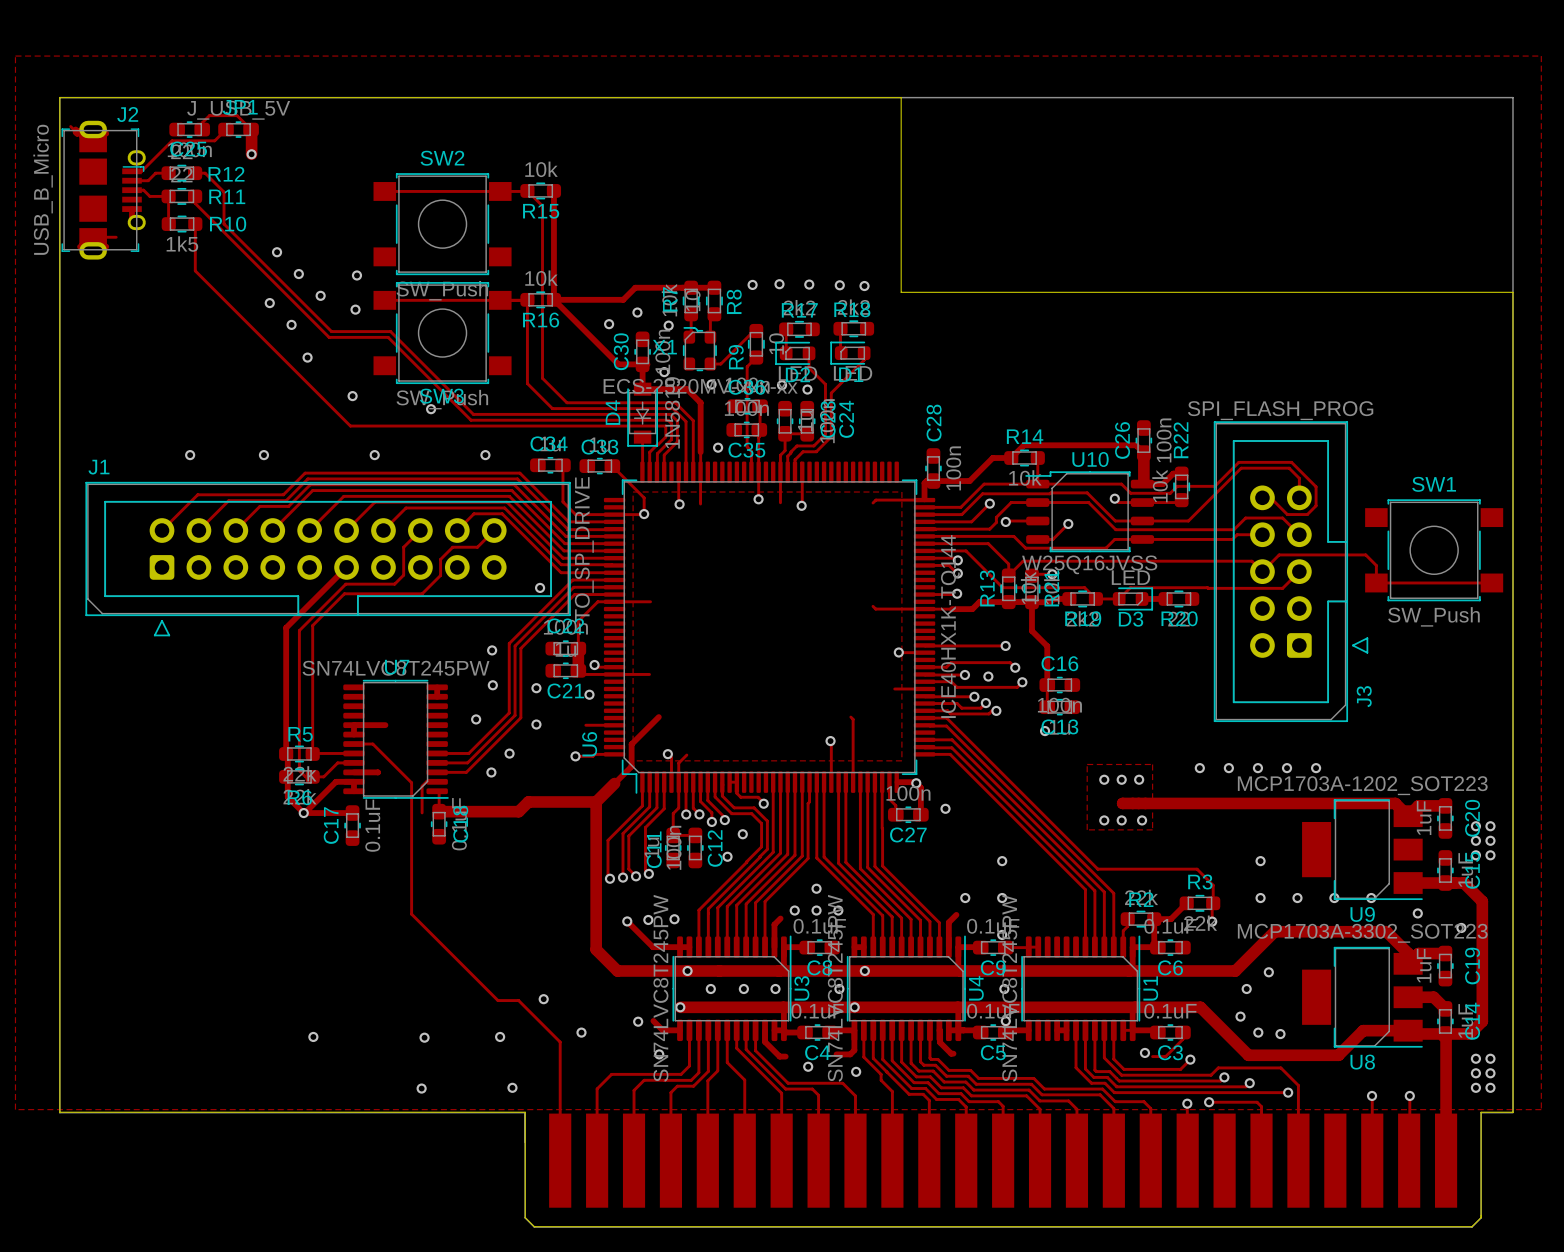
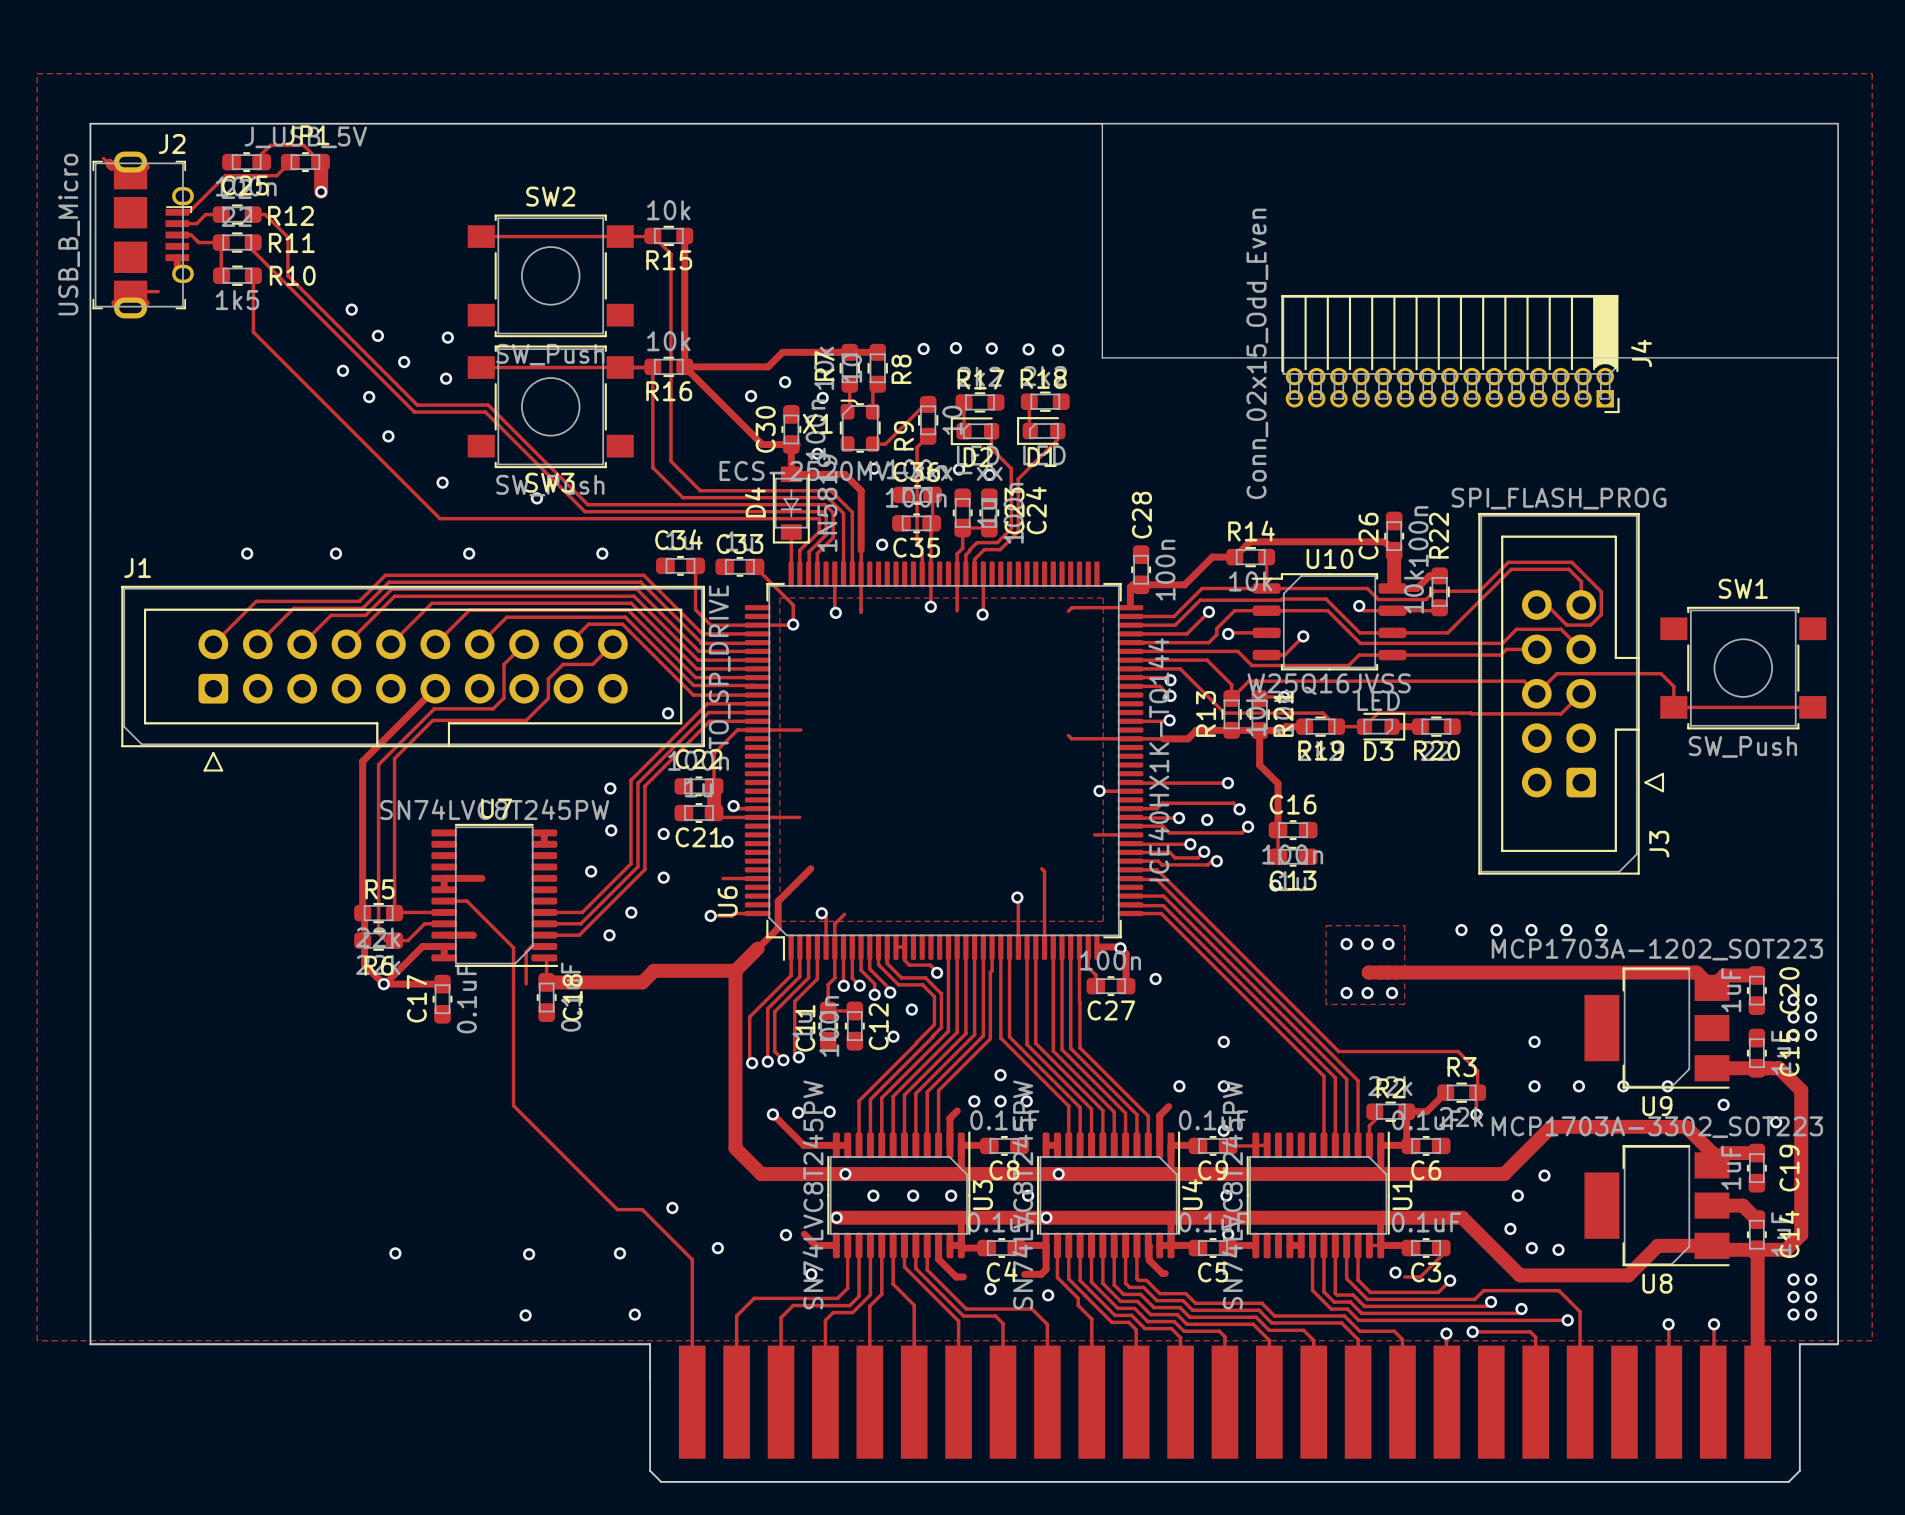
J4: none -> Conn_02x15_Odd_Even (1450, 354)

